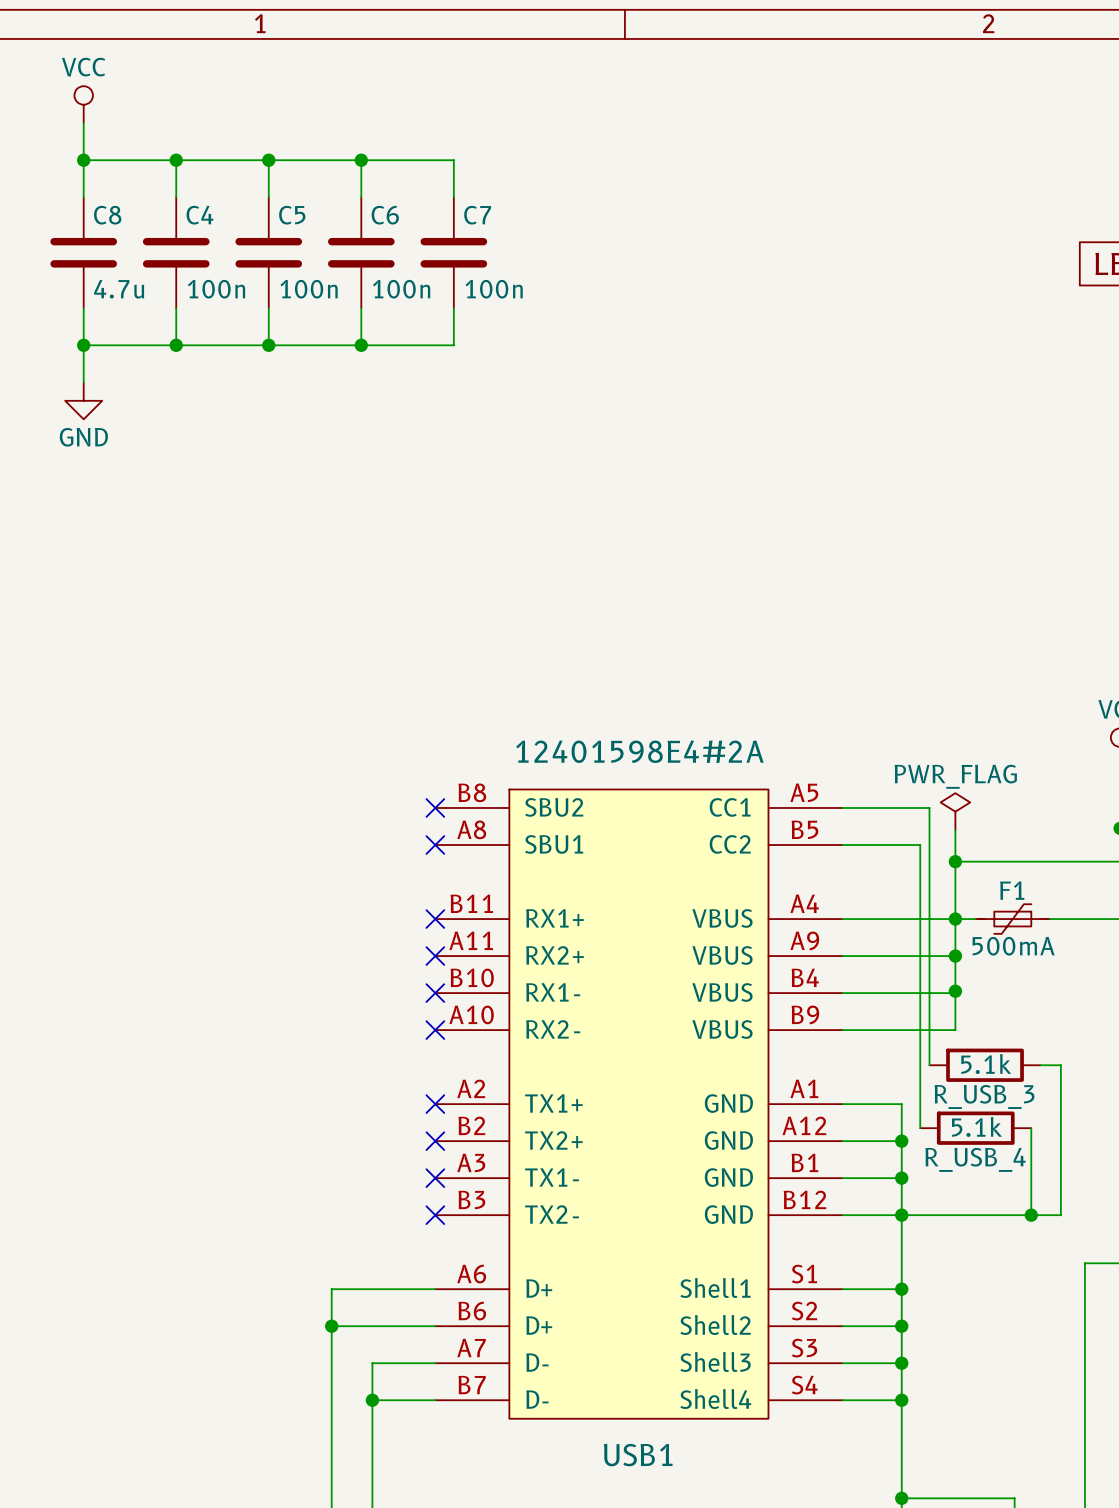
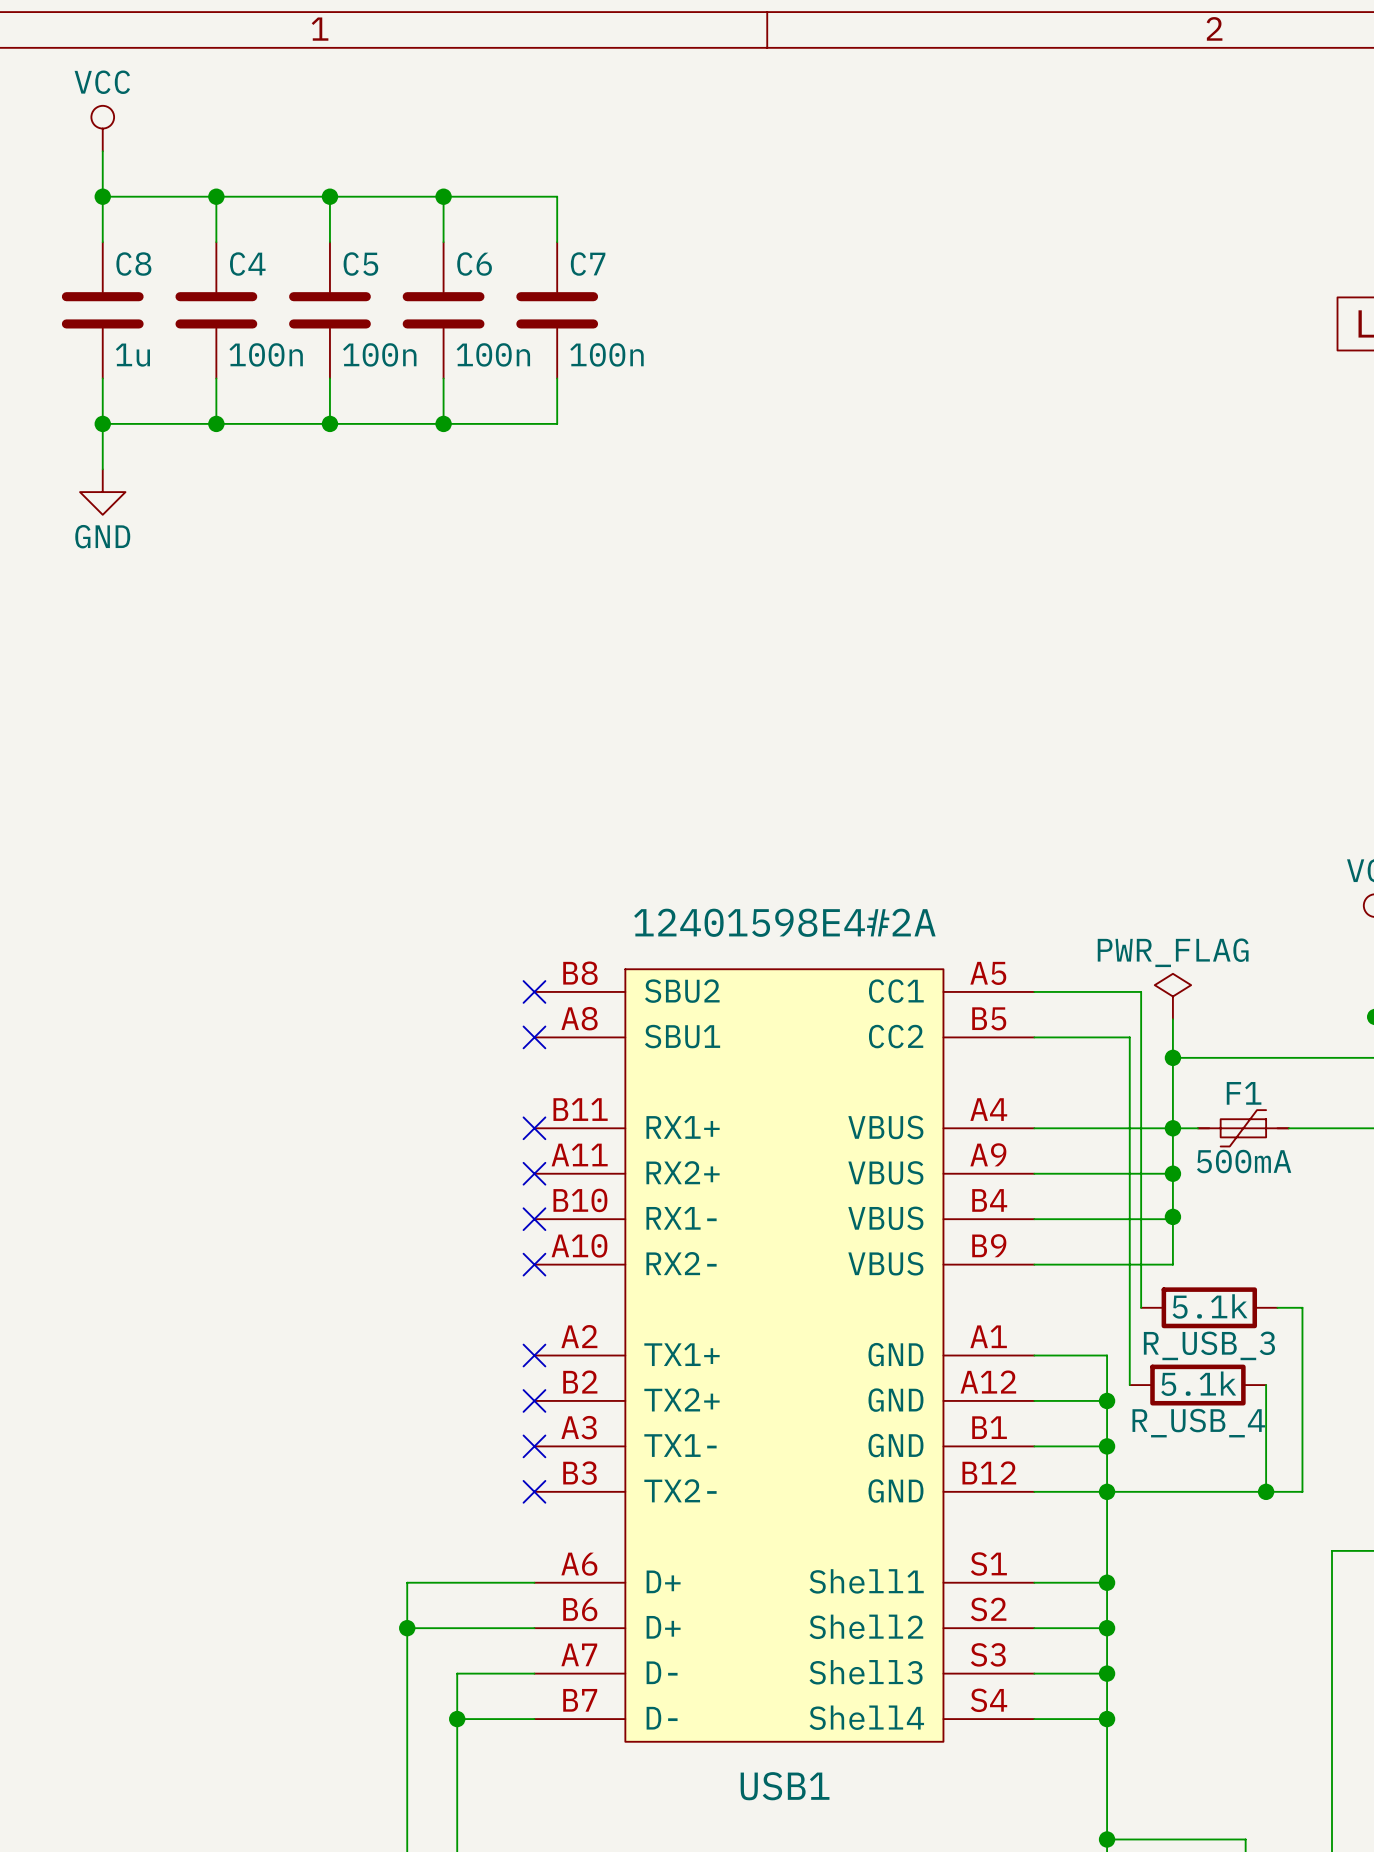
C8 value: 4.7u (119, 289) -> 1u (132, 355)

